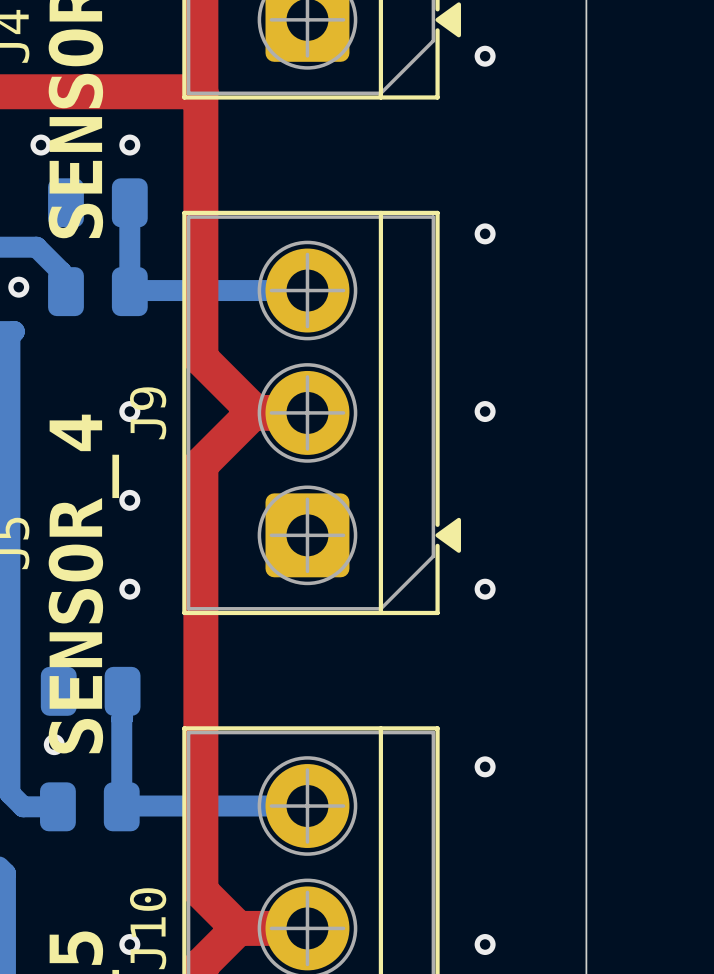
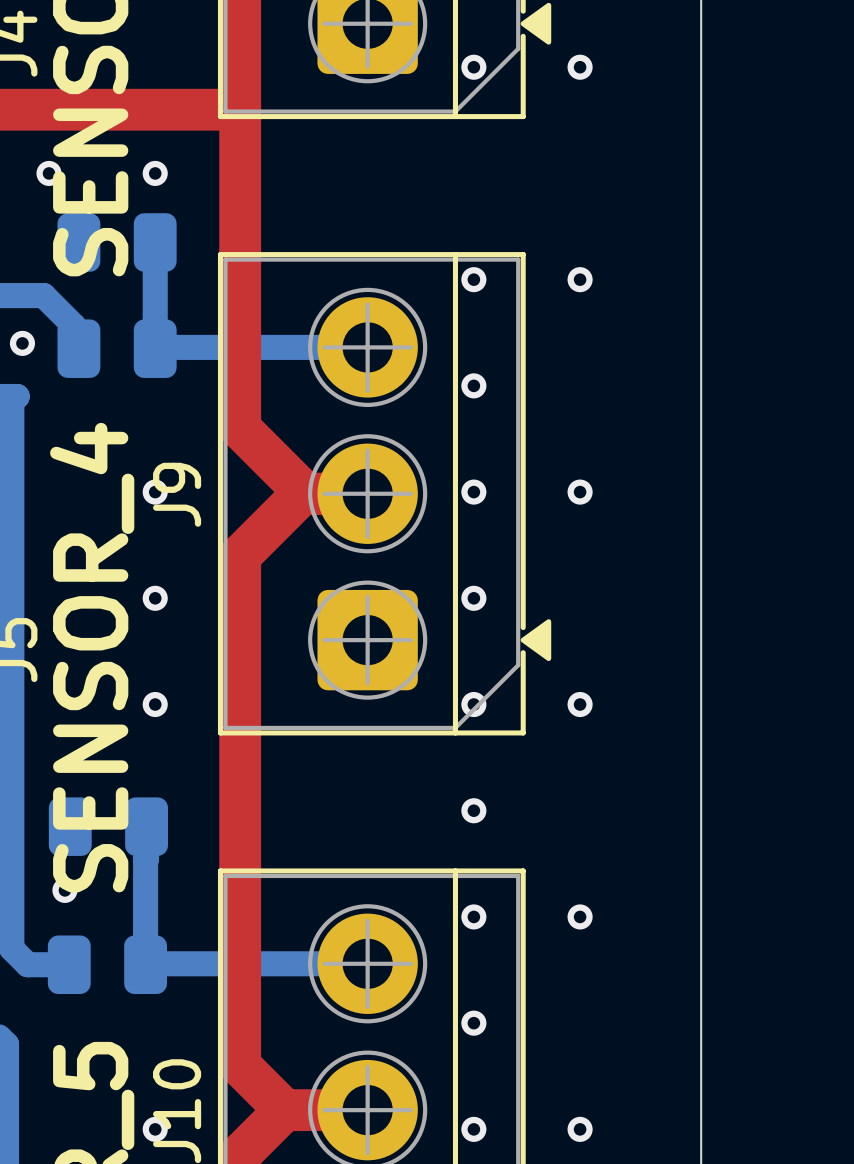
via: none -> (473, 67)
via: none -> (473, 279)
via: none -> (473, 385)
via: none -> (473, 492)
via: none -> (473, 598)
via: none -> (473, 704)
via: none -> (473, 810)
via: none -> (473, 916)
via: none -> (473, 1023)
via: none -> (473, 1129)

